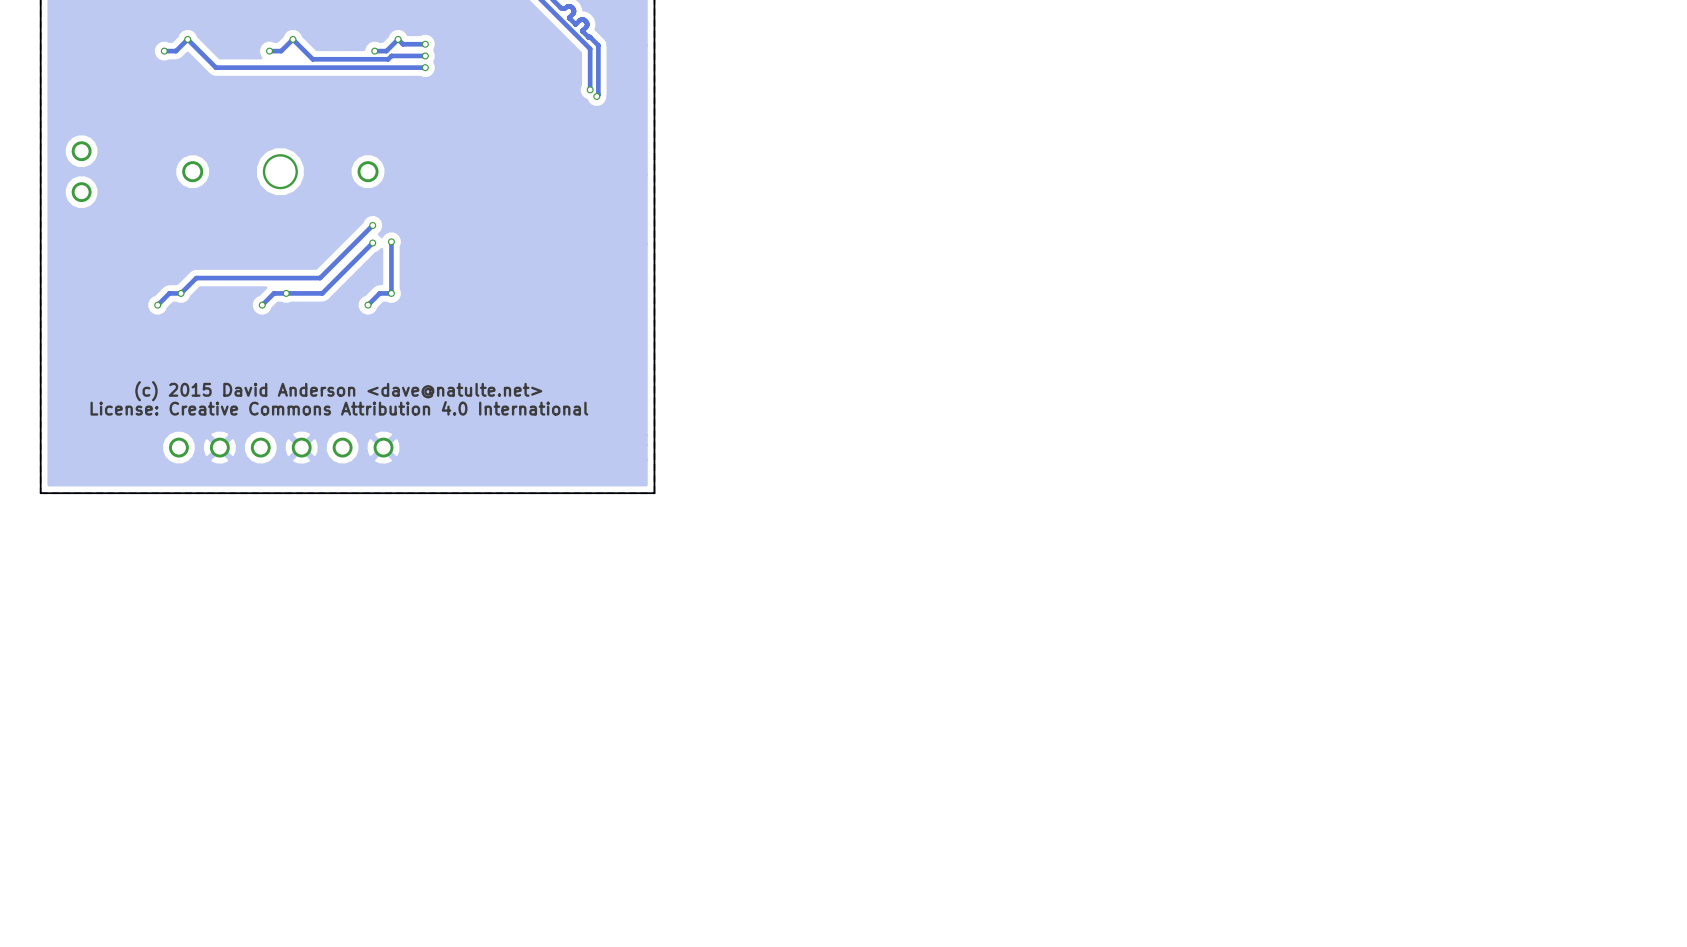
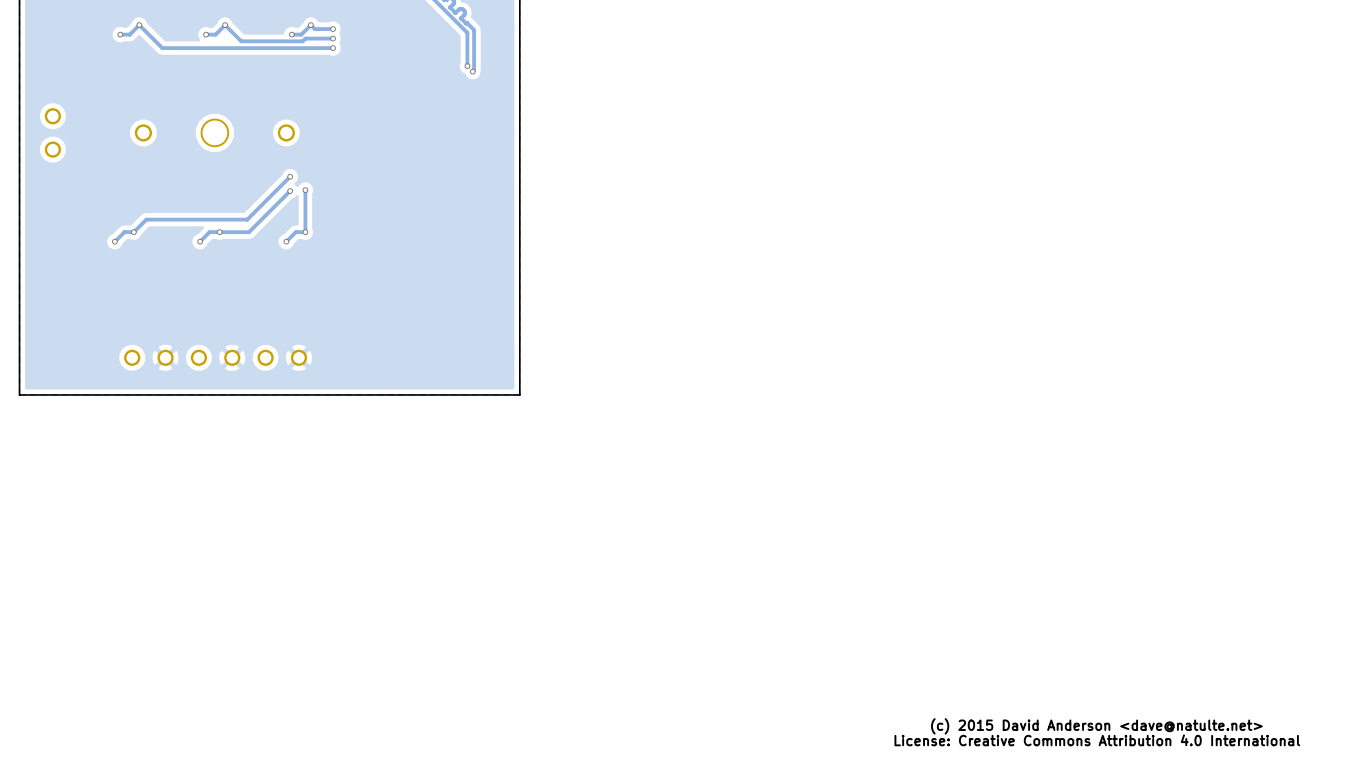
text: (c) 2015 David Anderson <dave@natulte.net> (338, 391) -> none
text: License: Creative Commons Attribution 4.0 International (339, 408) -> none
text: none -> (c) 2015 David Anderson <dave@natulte.net> (1096, 726)
text: none -> License: Creative Commons Attribution 4.0 International (1097, 740)

